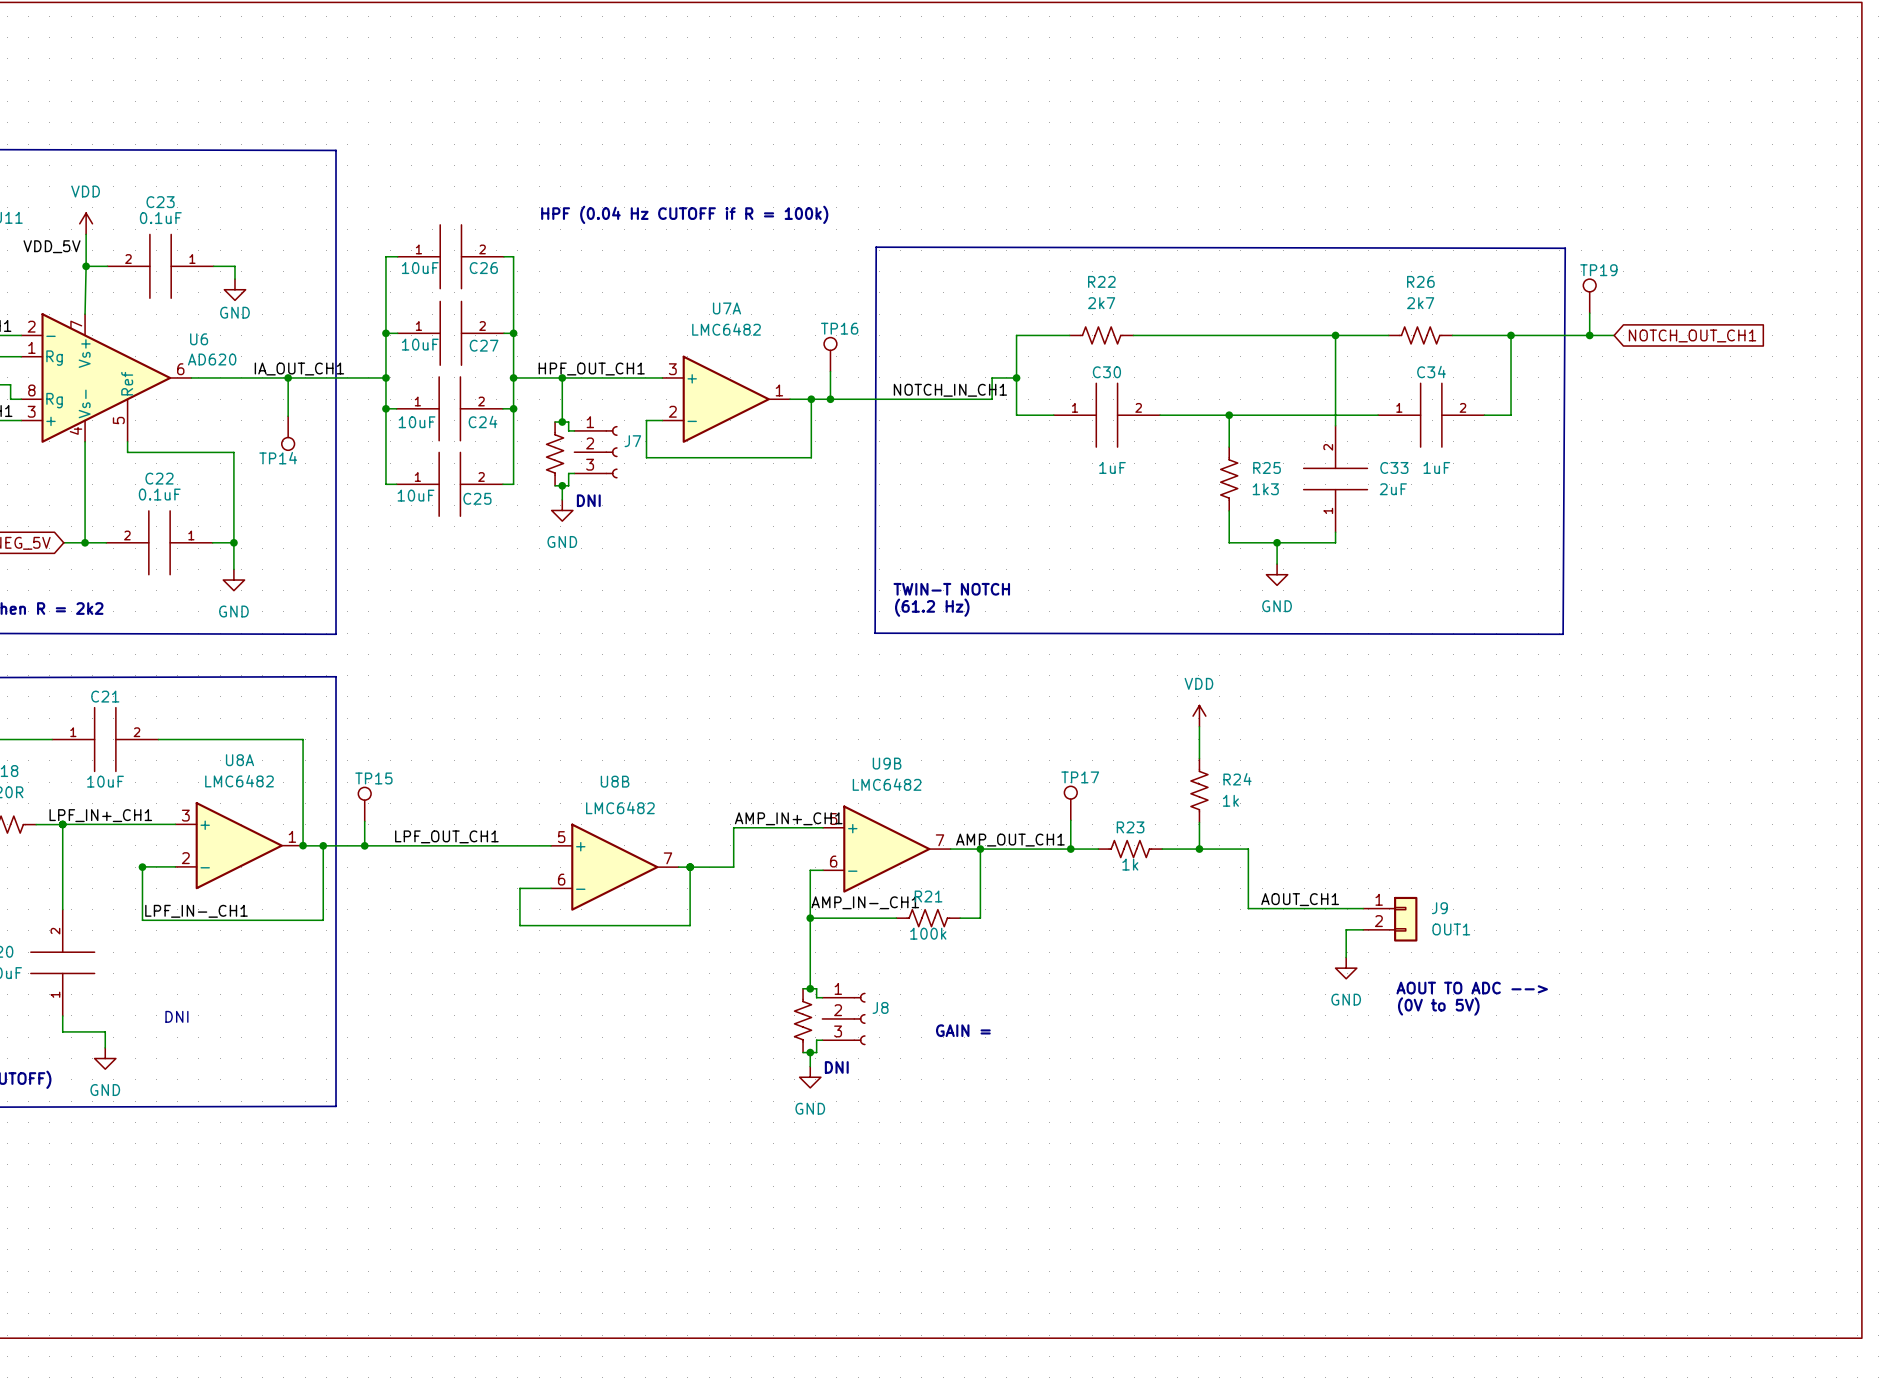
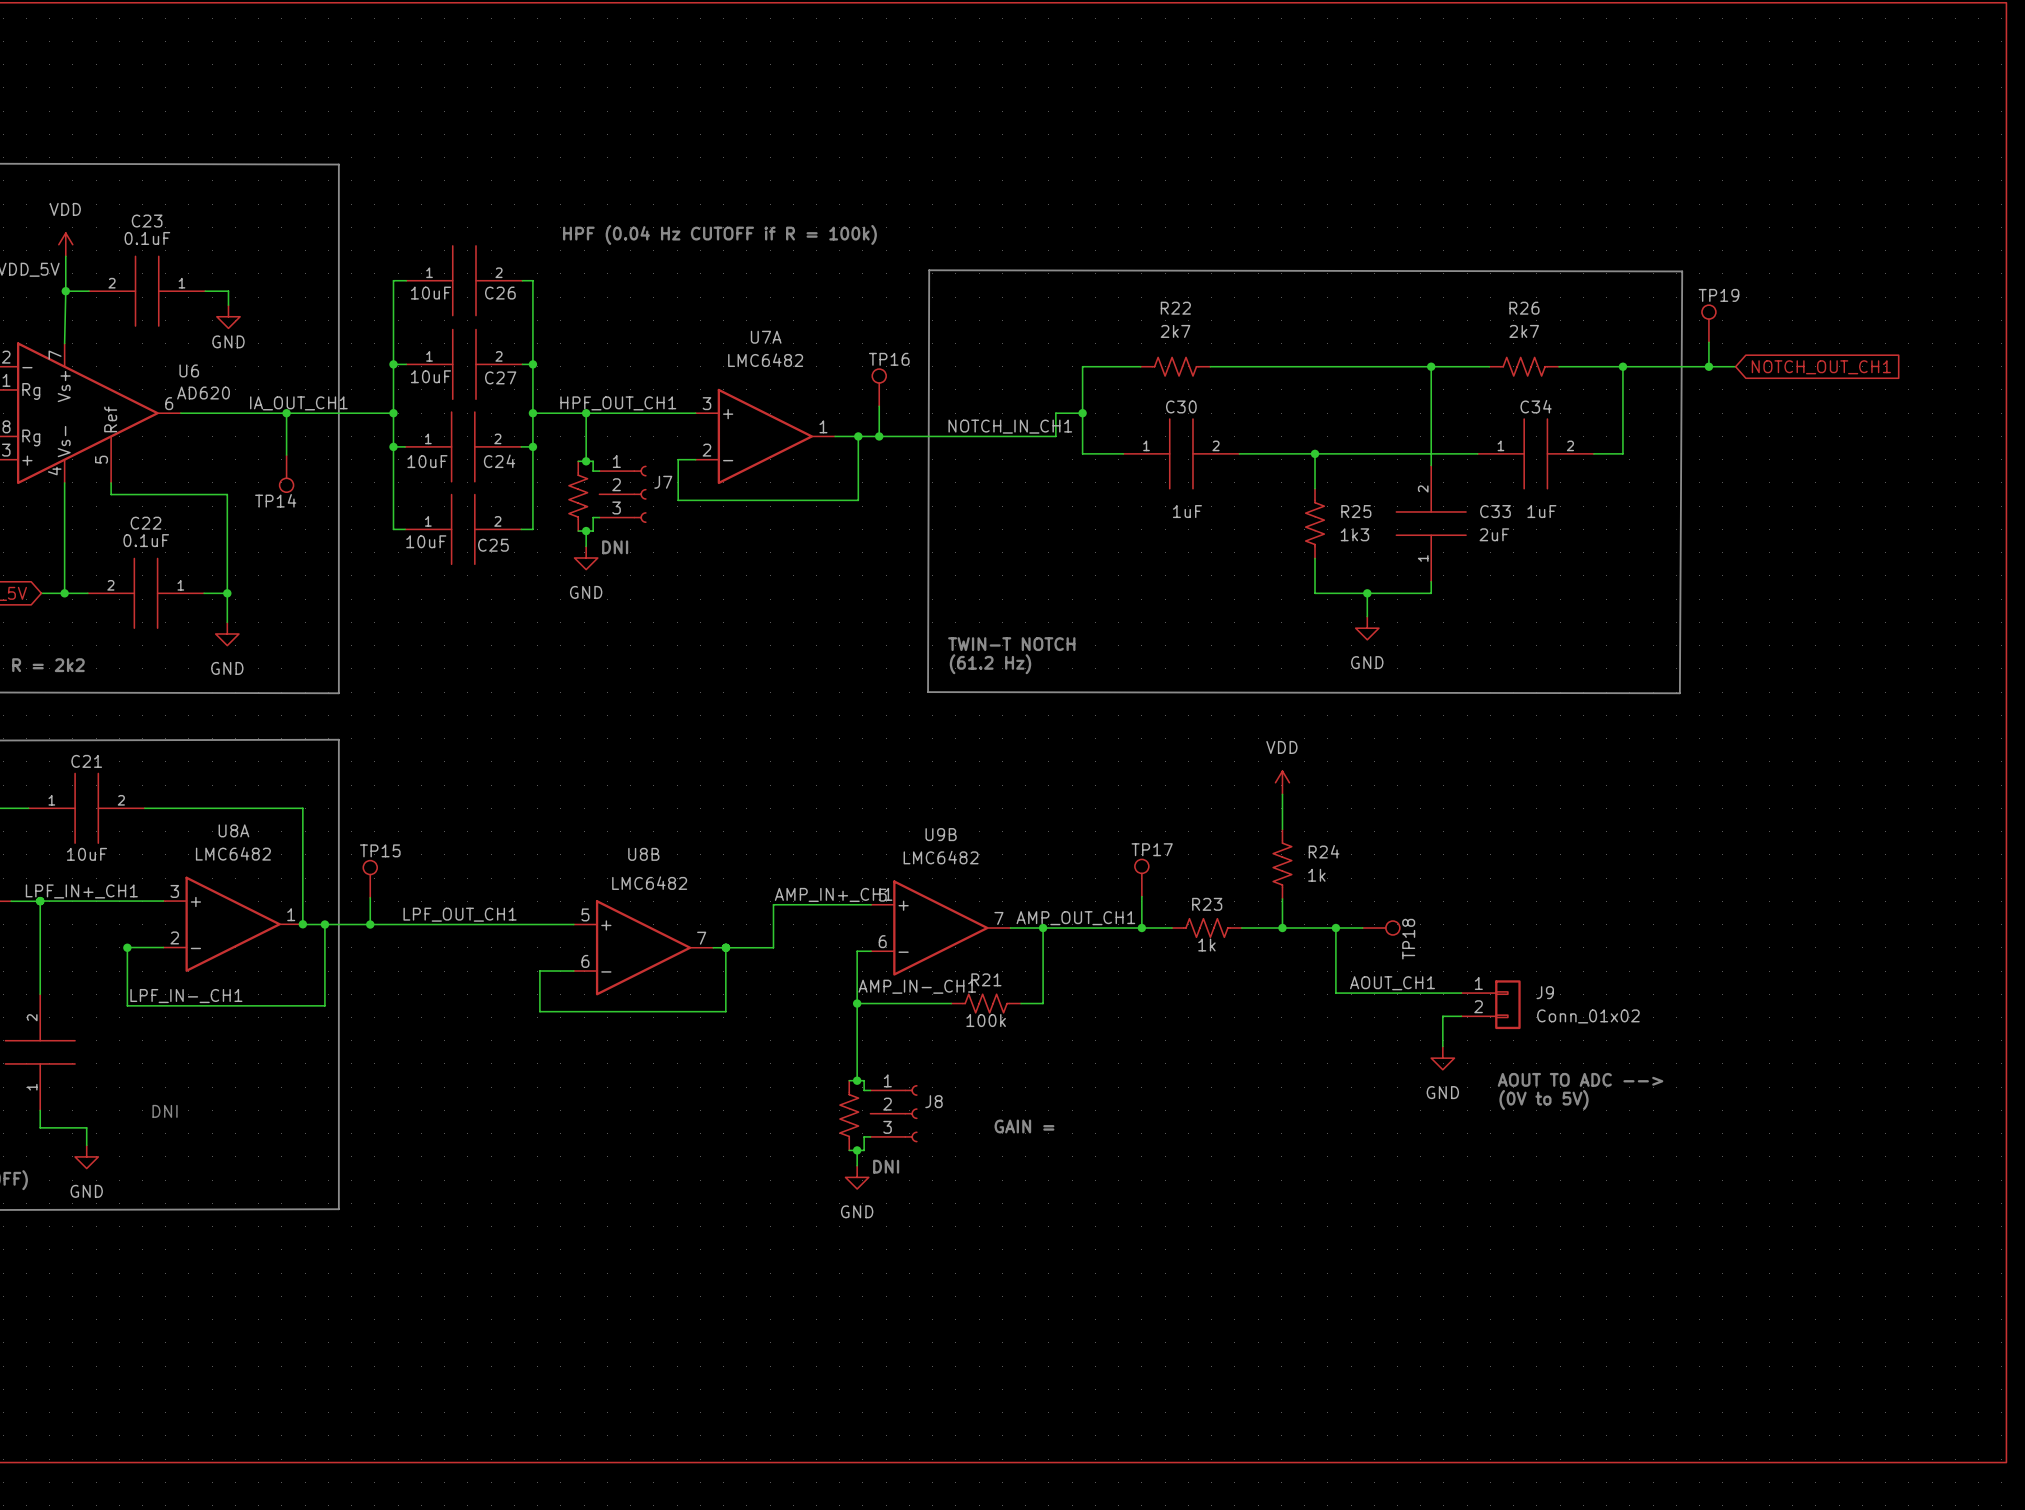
wire: none -> (1335, 928) (1362, 928)
junction: none -> (1335, 928)
TP18: none -> (1381, 928)
J9 value: OUT1 (1451, 929) -> Conn_01x02 (1588, 1016)

